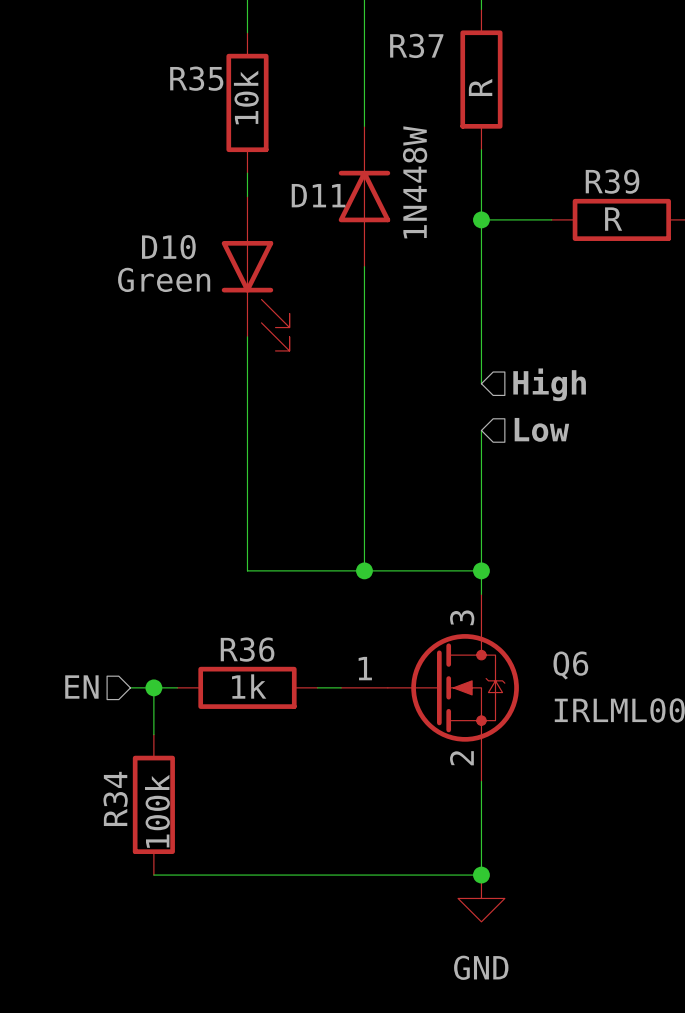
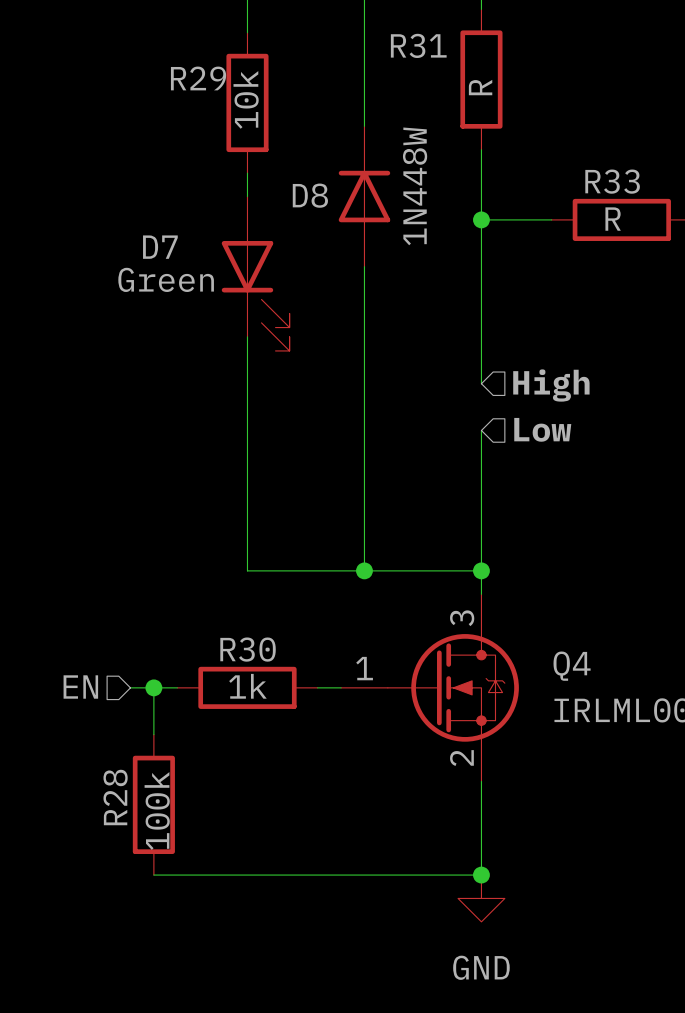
R37 name: R37 (416, 45) -> R31 (418, 45)
R35 name: R35 (196, 78) -> R29 (198, 78)
R39 name: R39 (612, 181) -> R33 (612, 181)
D11 name: D11 (318, 195) -> D8 (310, 195)
D10 name: D10 (168, 247) -> D7 (160, 247)
R36 name: R36 (247, 649) -> R30 (248, 649)
Q6 name: Q6 (570, 665) -> Q4 (572, 666)
R34 name: R34 (115, 798) -> R28 (115, 797)

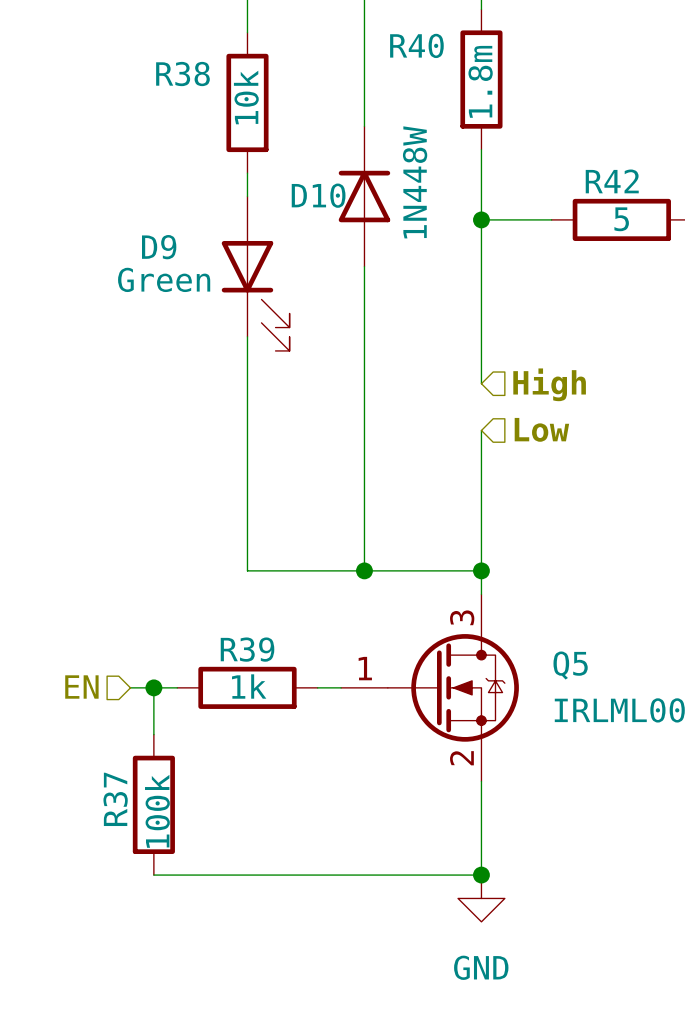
R31 name: R31 (418, 45) -> R40 (416, 45)
R29 name: R29 (198, 78) -> R38 (182, 74)
R31 value: R (480, 87) -> 1.8m (480, 81)
R33 name: R33 (612, 181) -> R42 (612, 181)
D8 name: D8 (310, 195) -> D10 (318, 195)
R33 value: R (613, 219) -> 5 (621, 219)
D7 name: D7 (160, 247) -> D9 (159, 247)
R30 name: R30 (248, 649) -> R39 (247, 649)
Q4 name: Q4 (572, 666) -> Q5 (570, 665)
R28 name: R28 (115, 797) -> R37 (115, 799)

